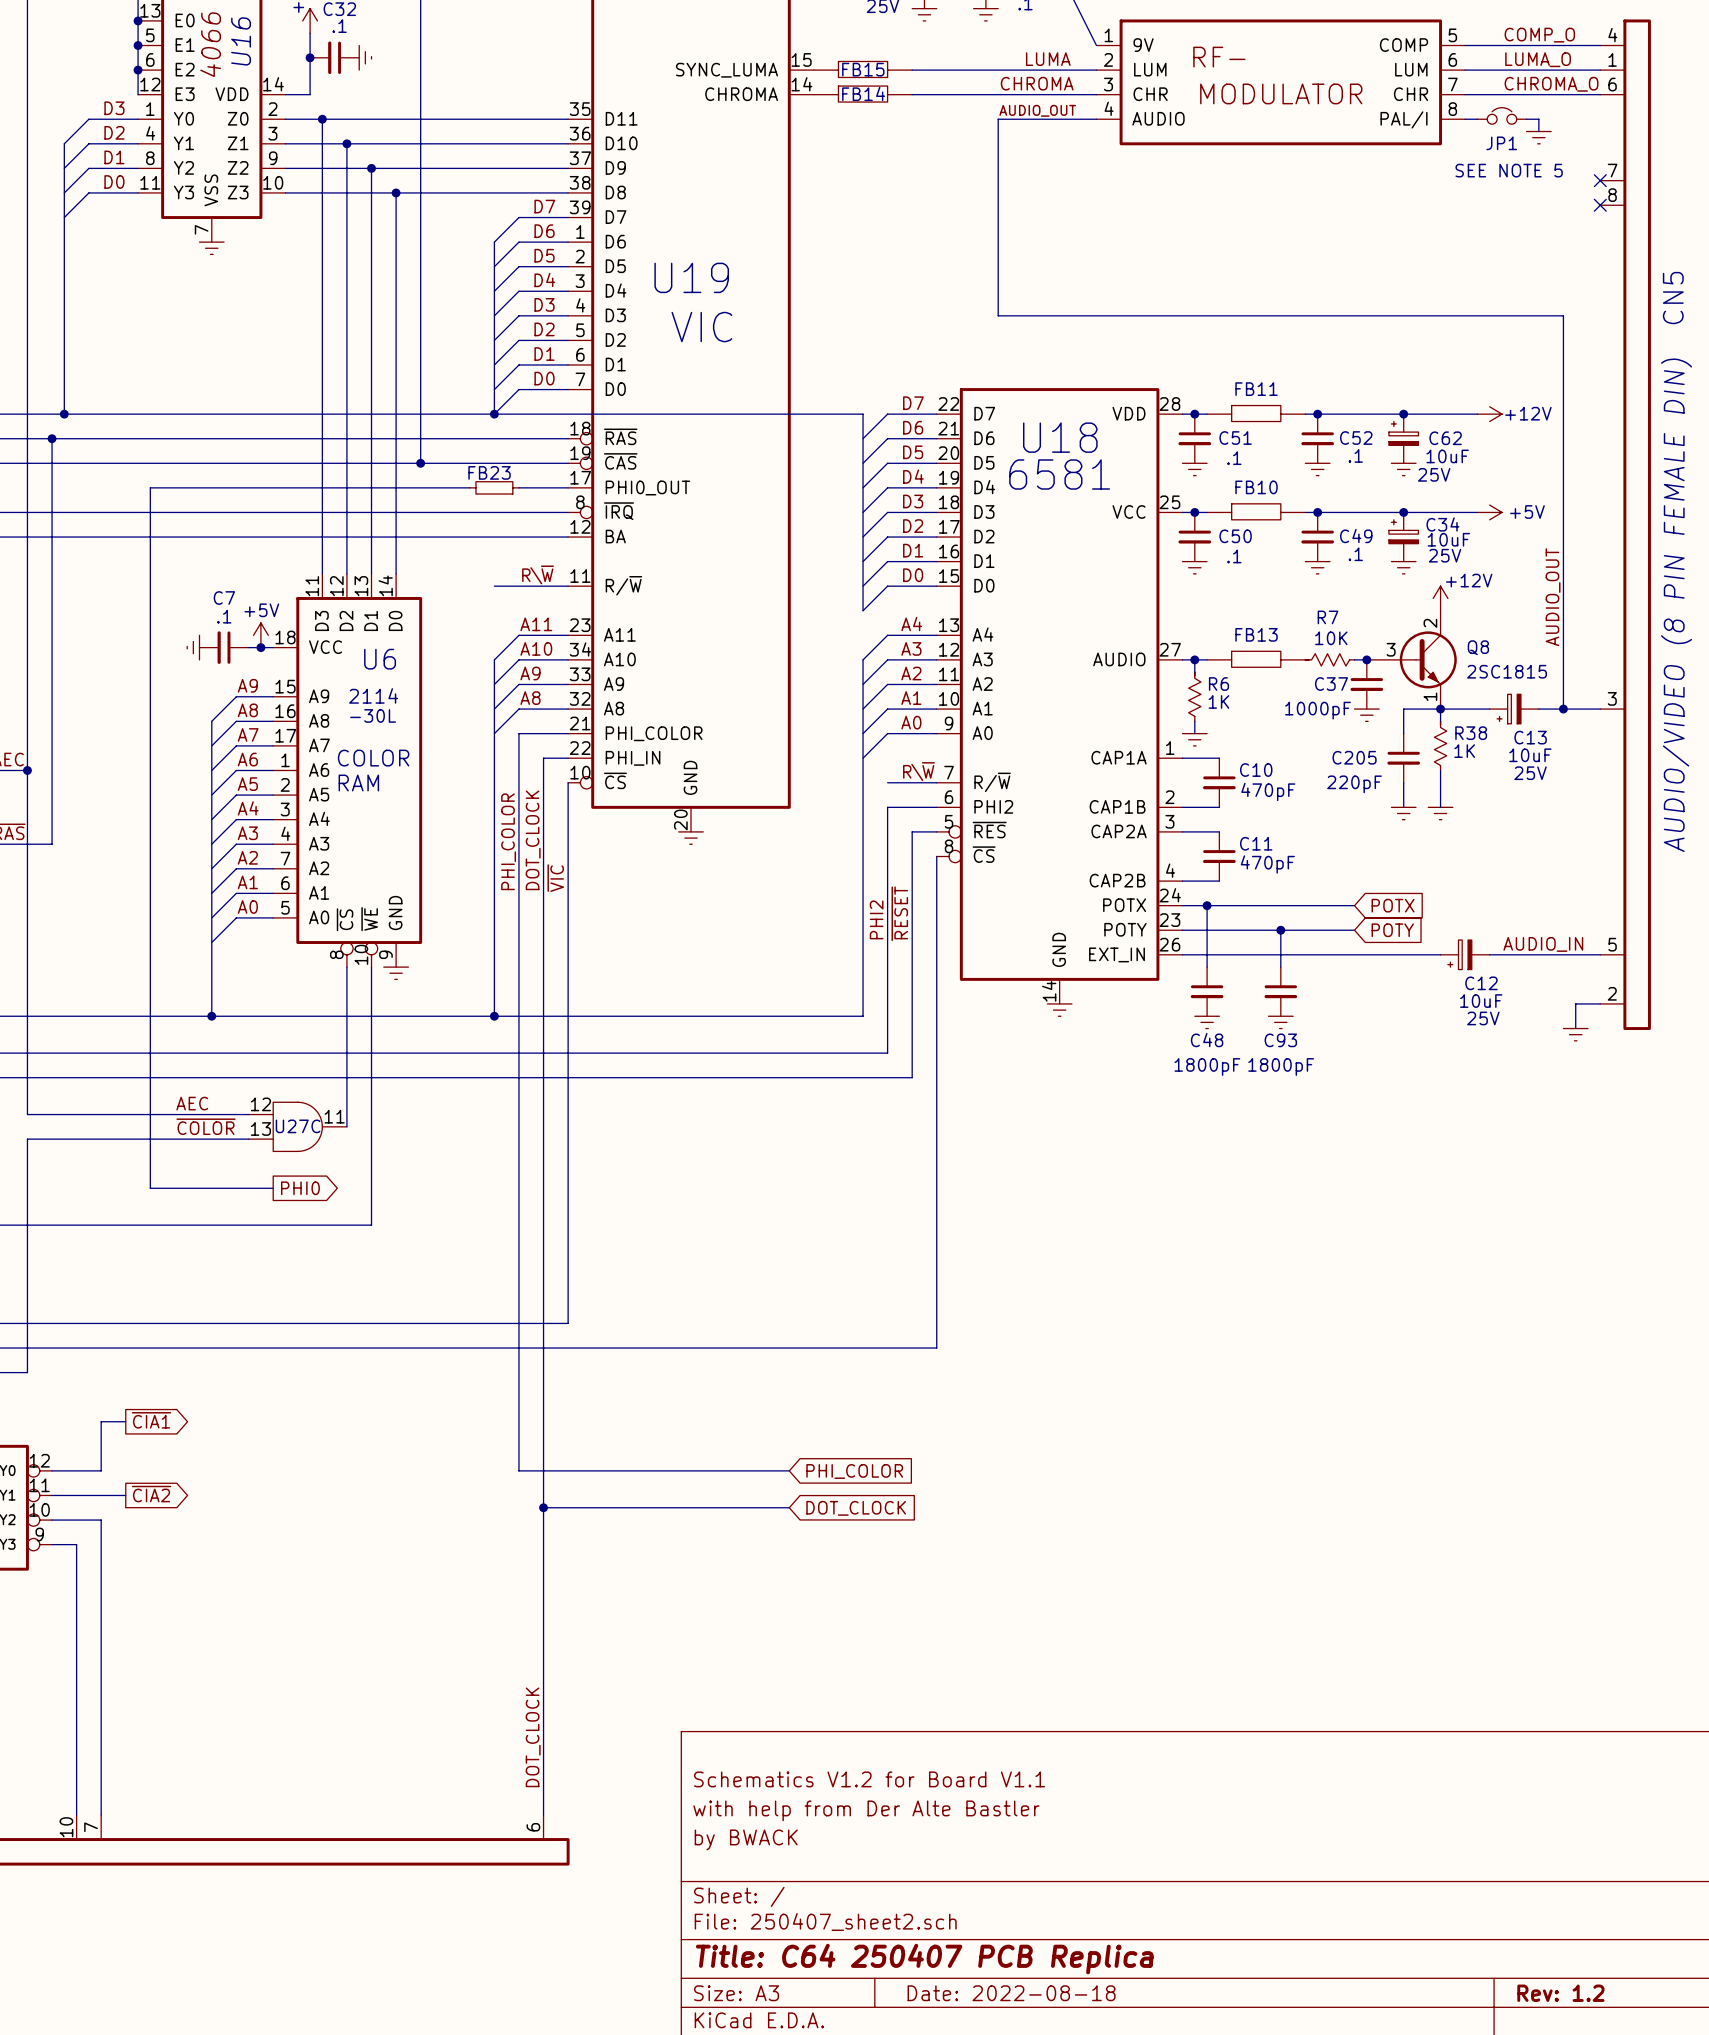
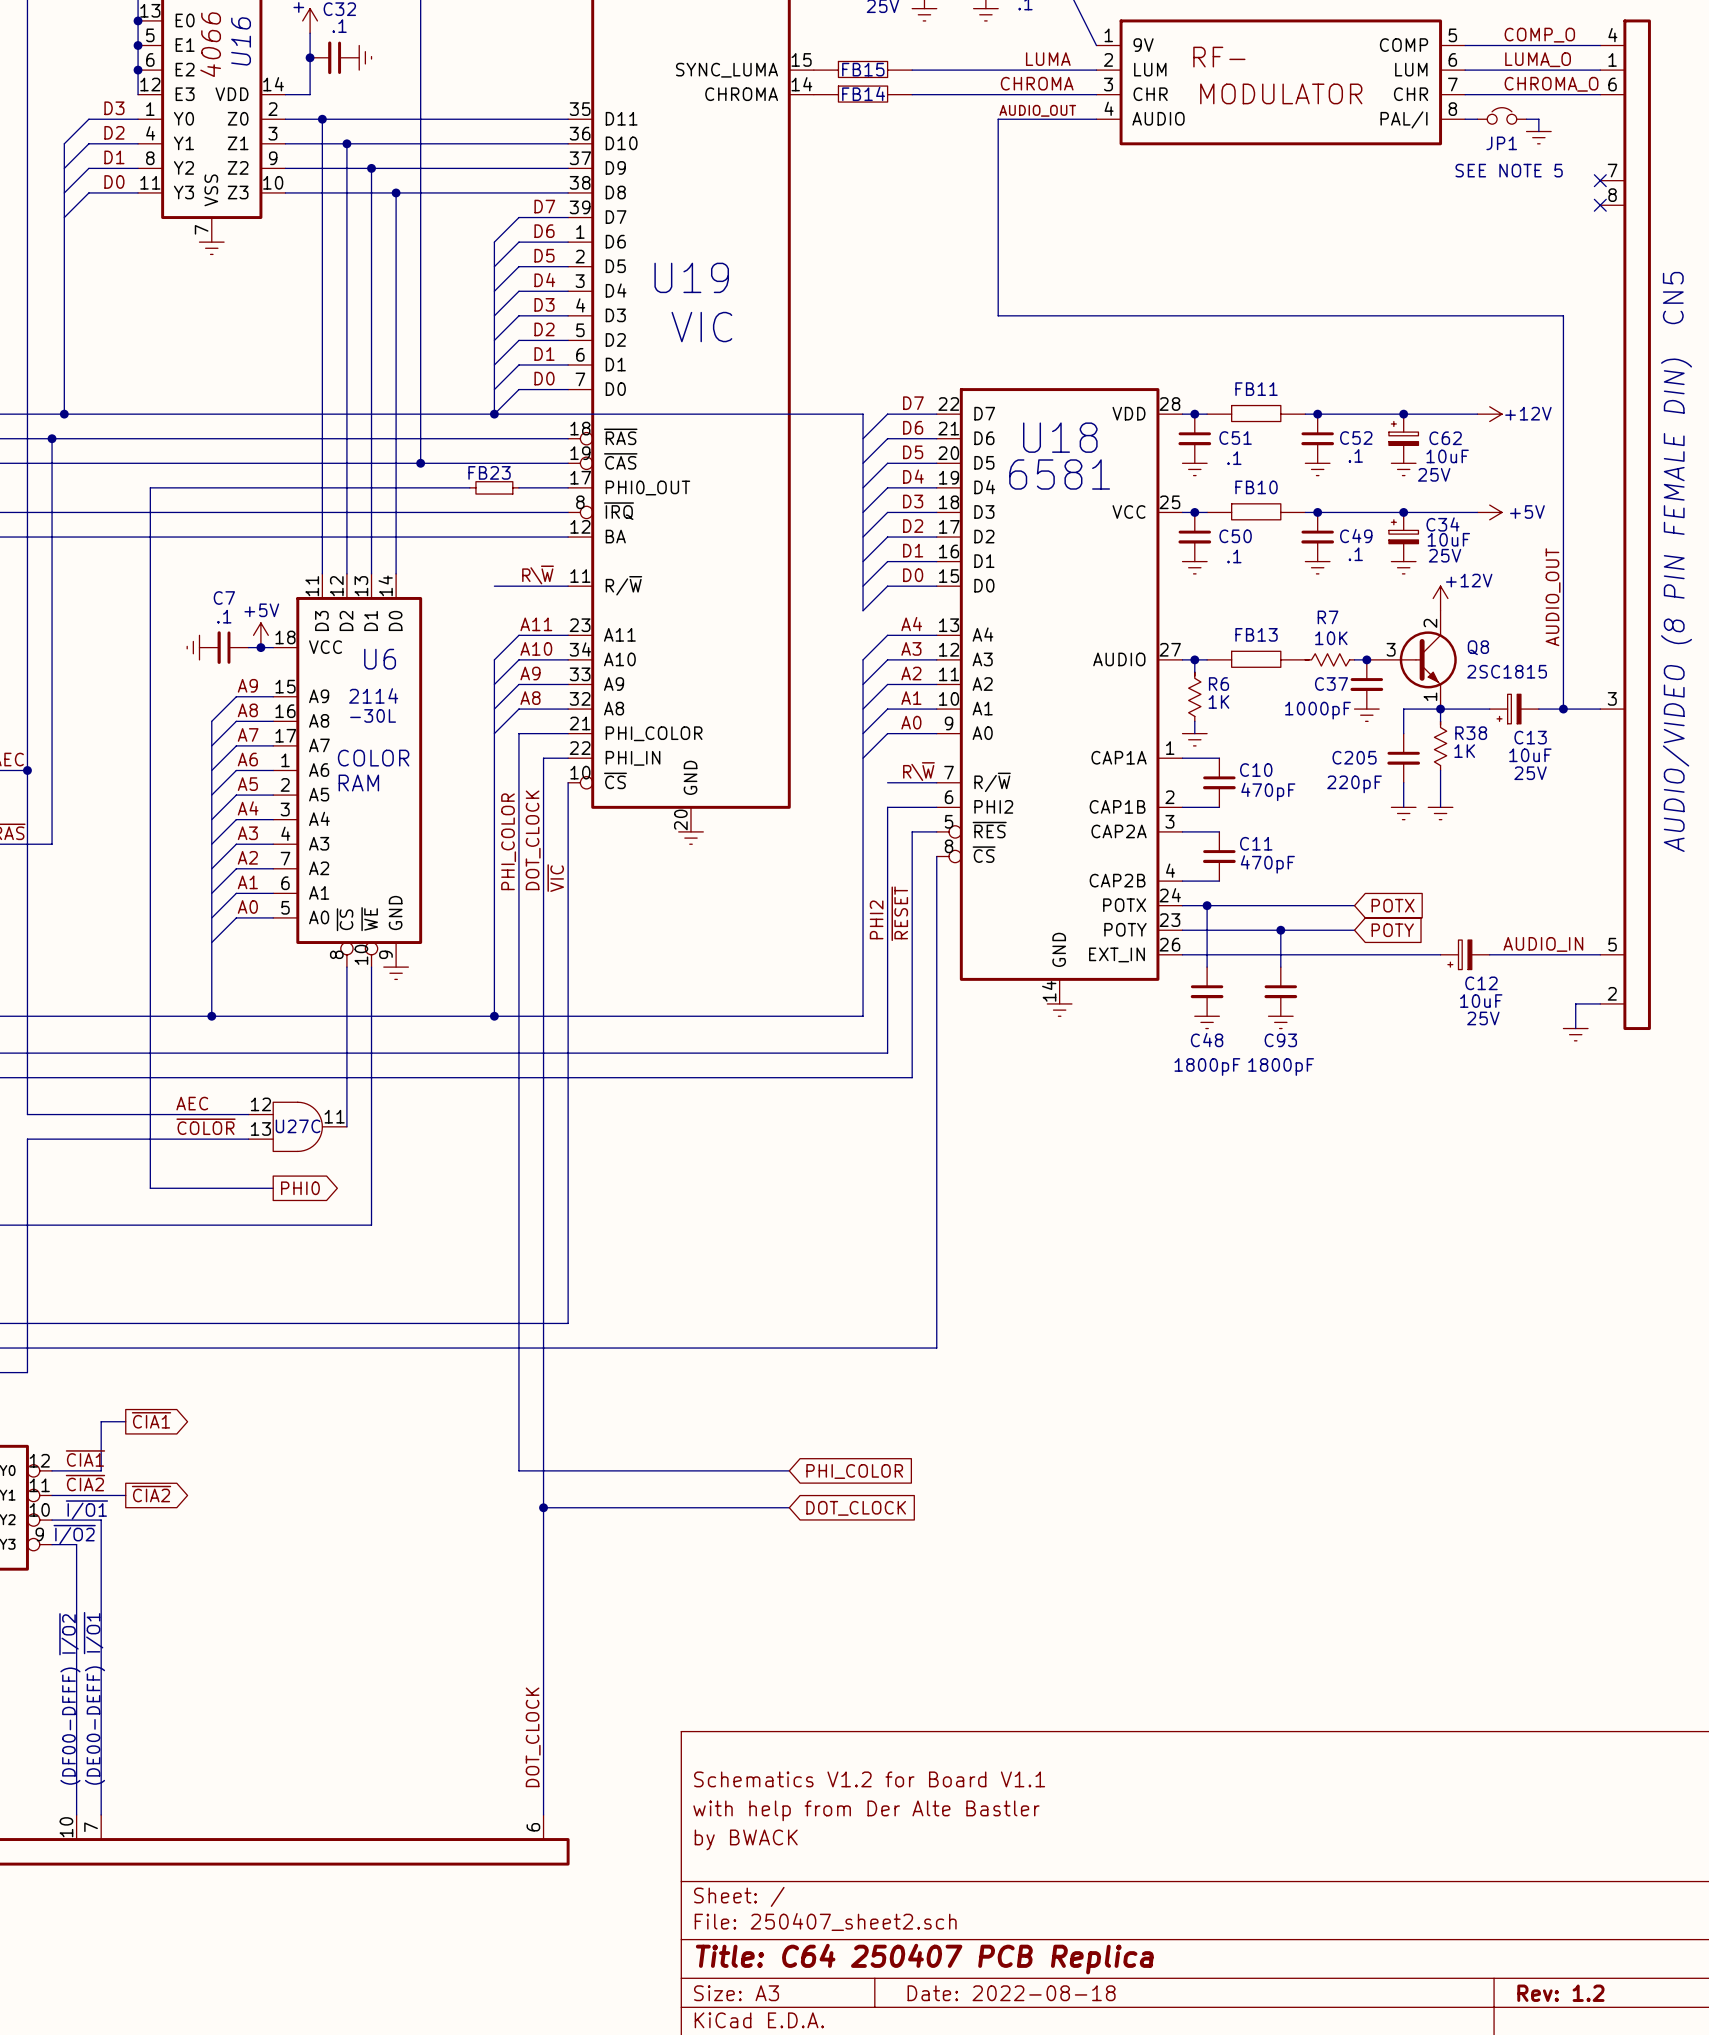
label: none -> ~{CIA1} (85, 1458)
label: none -> ~{CIA2} (85, 1483)
text: none -> ~{I/O1} (86, 1510)
text: none -> ~{I/O2} (74, 1534)
text: none -> (DF00-DFFF) ~{I/O2} (69, 1698)
text: none -> (DE00-DEFF) ~{I/O1} (94, 1698)

